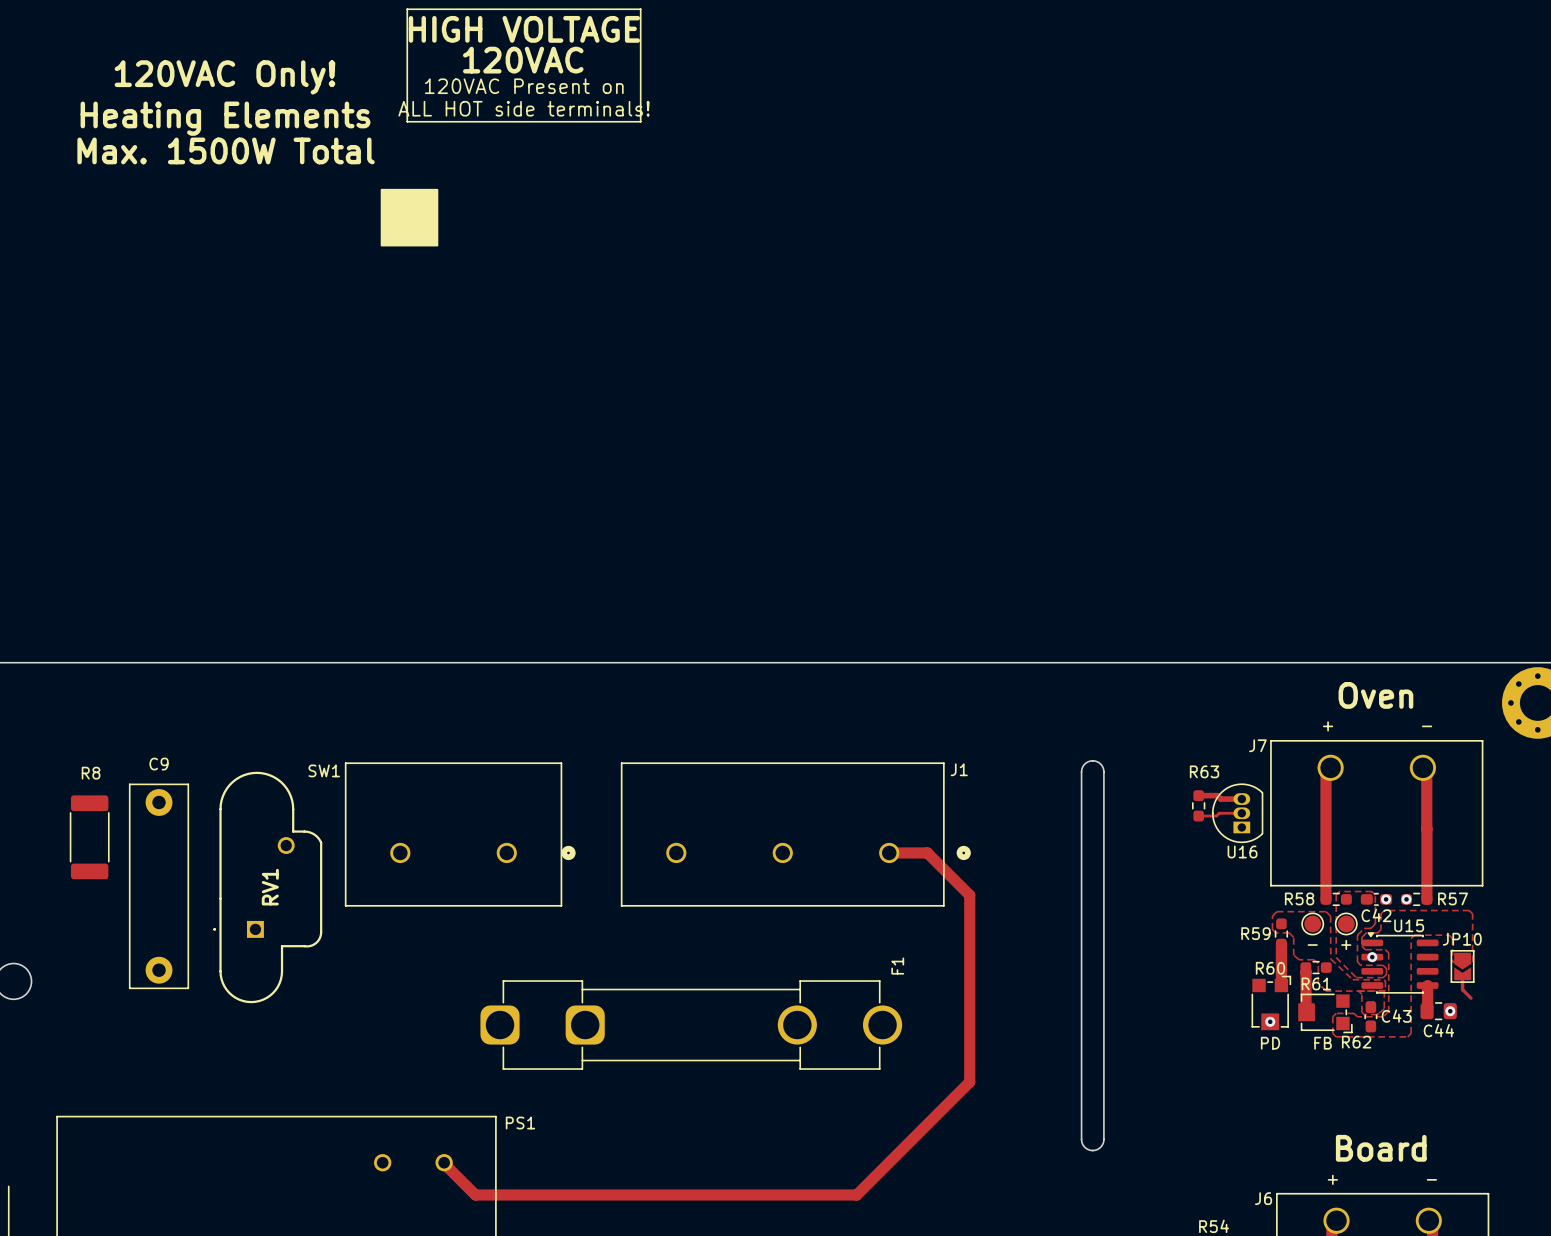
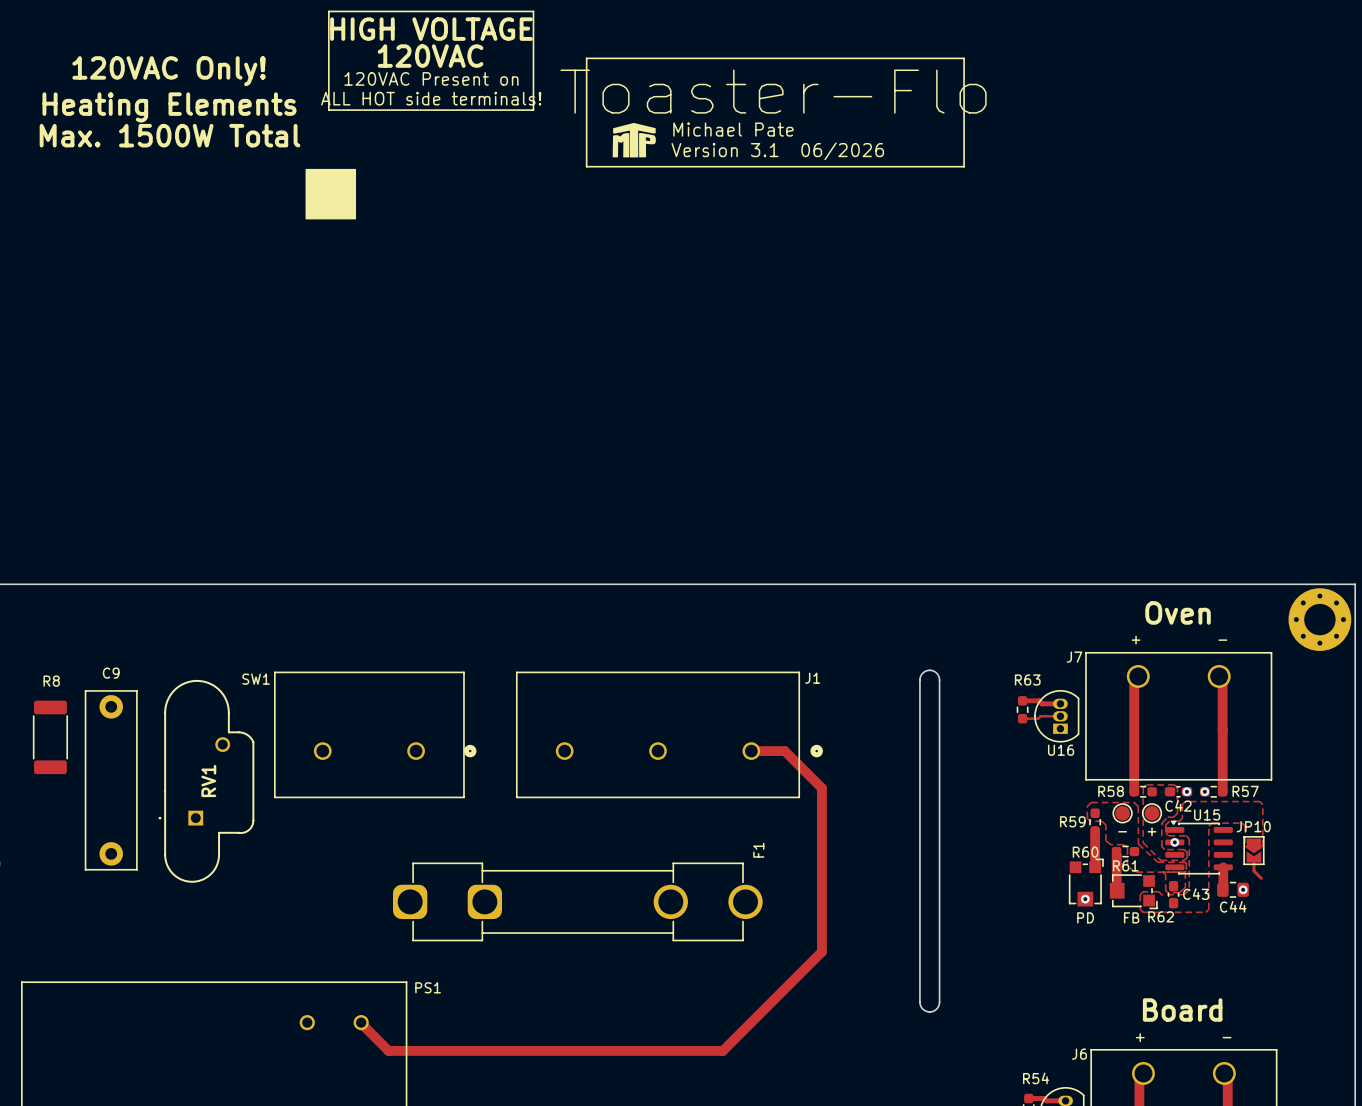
line: none -> (586, 58) (964, 58) (964, 166) (586, 166) (586, 58)
text: none -> Toaster-Flo (773, 91)
drawing: none -> [612, 122, 656, 158]
text: none -> Michael Pate (733, 129)
text: none -> Version 3.1 06/2026 (777, 151)

